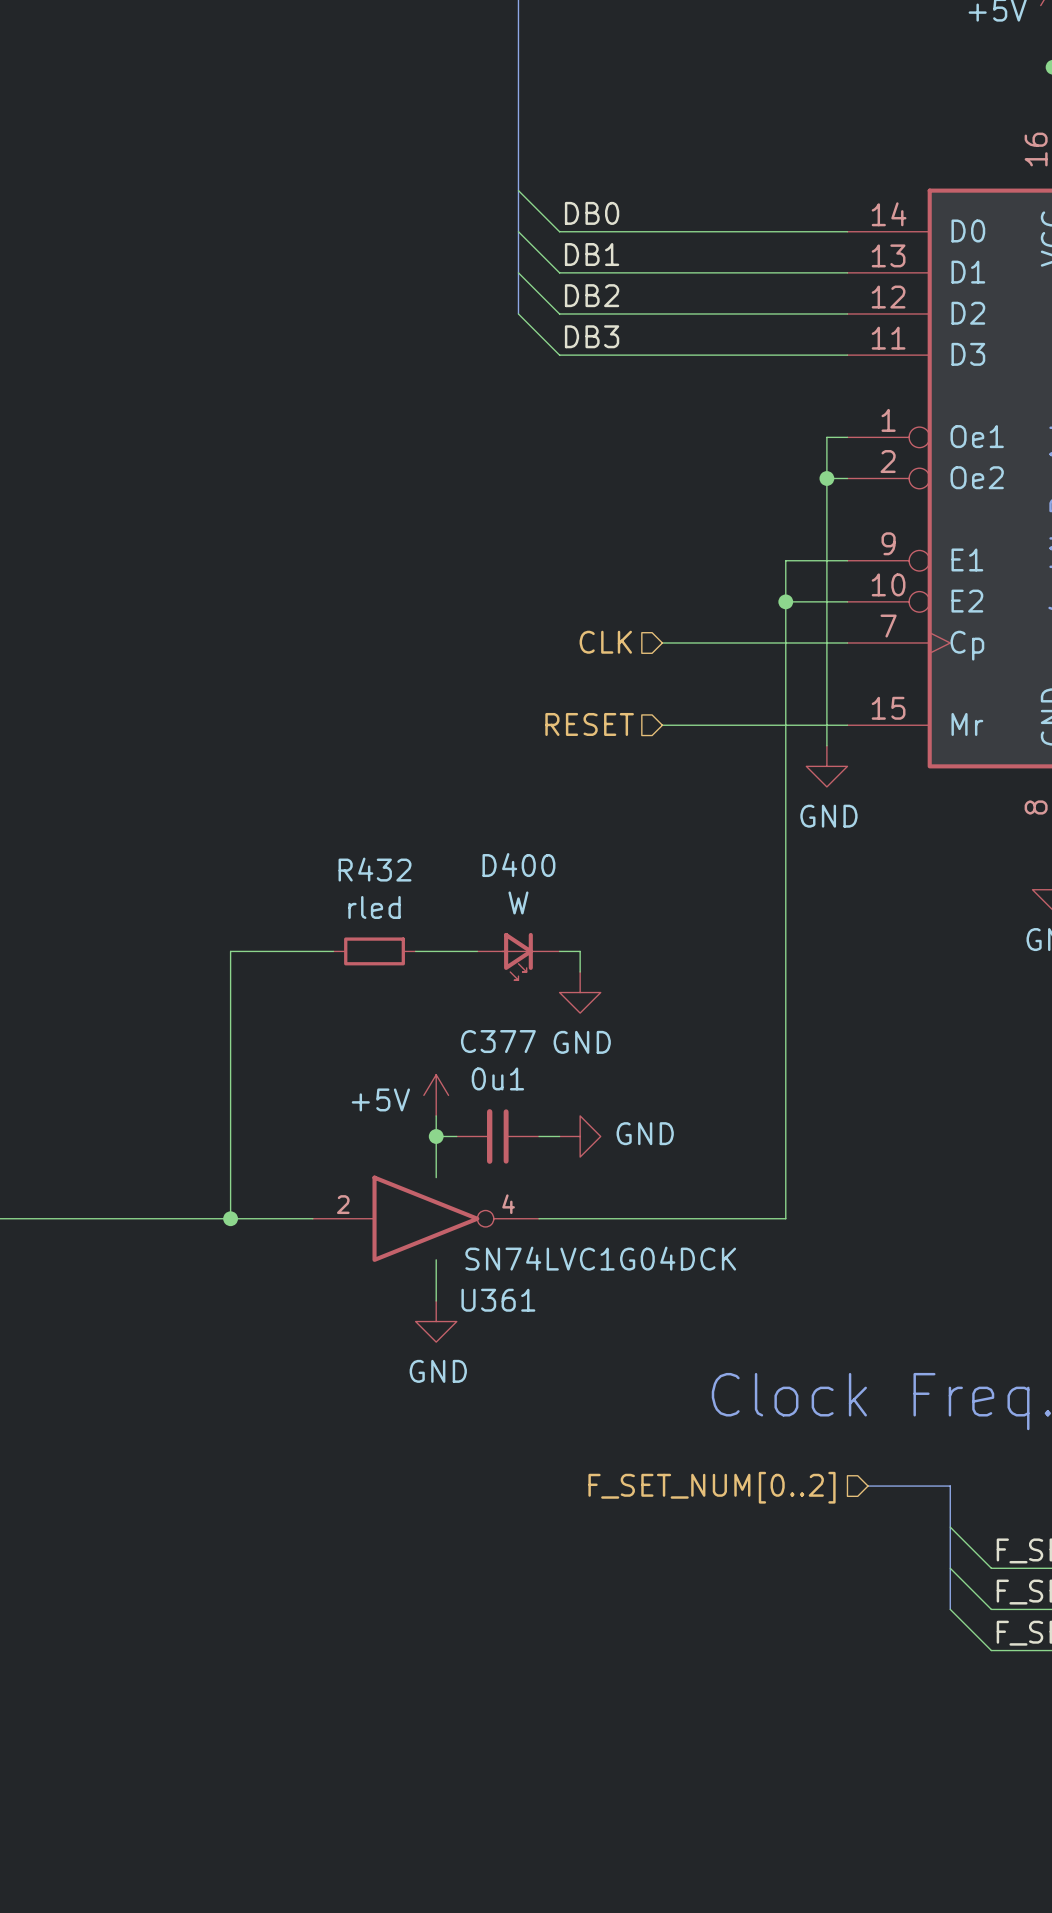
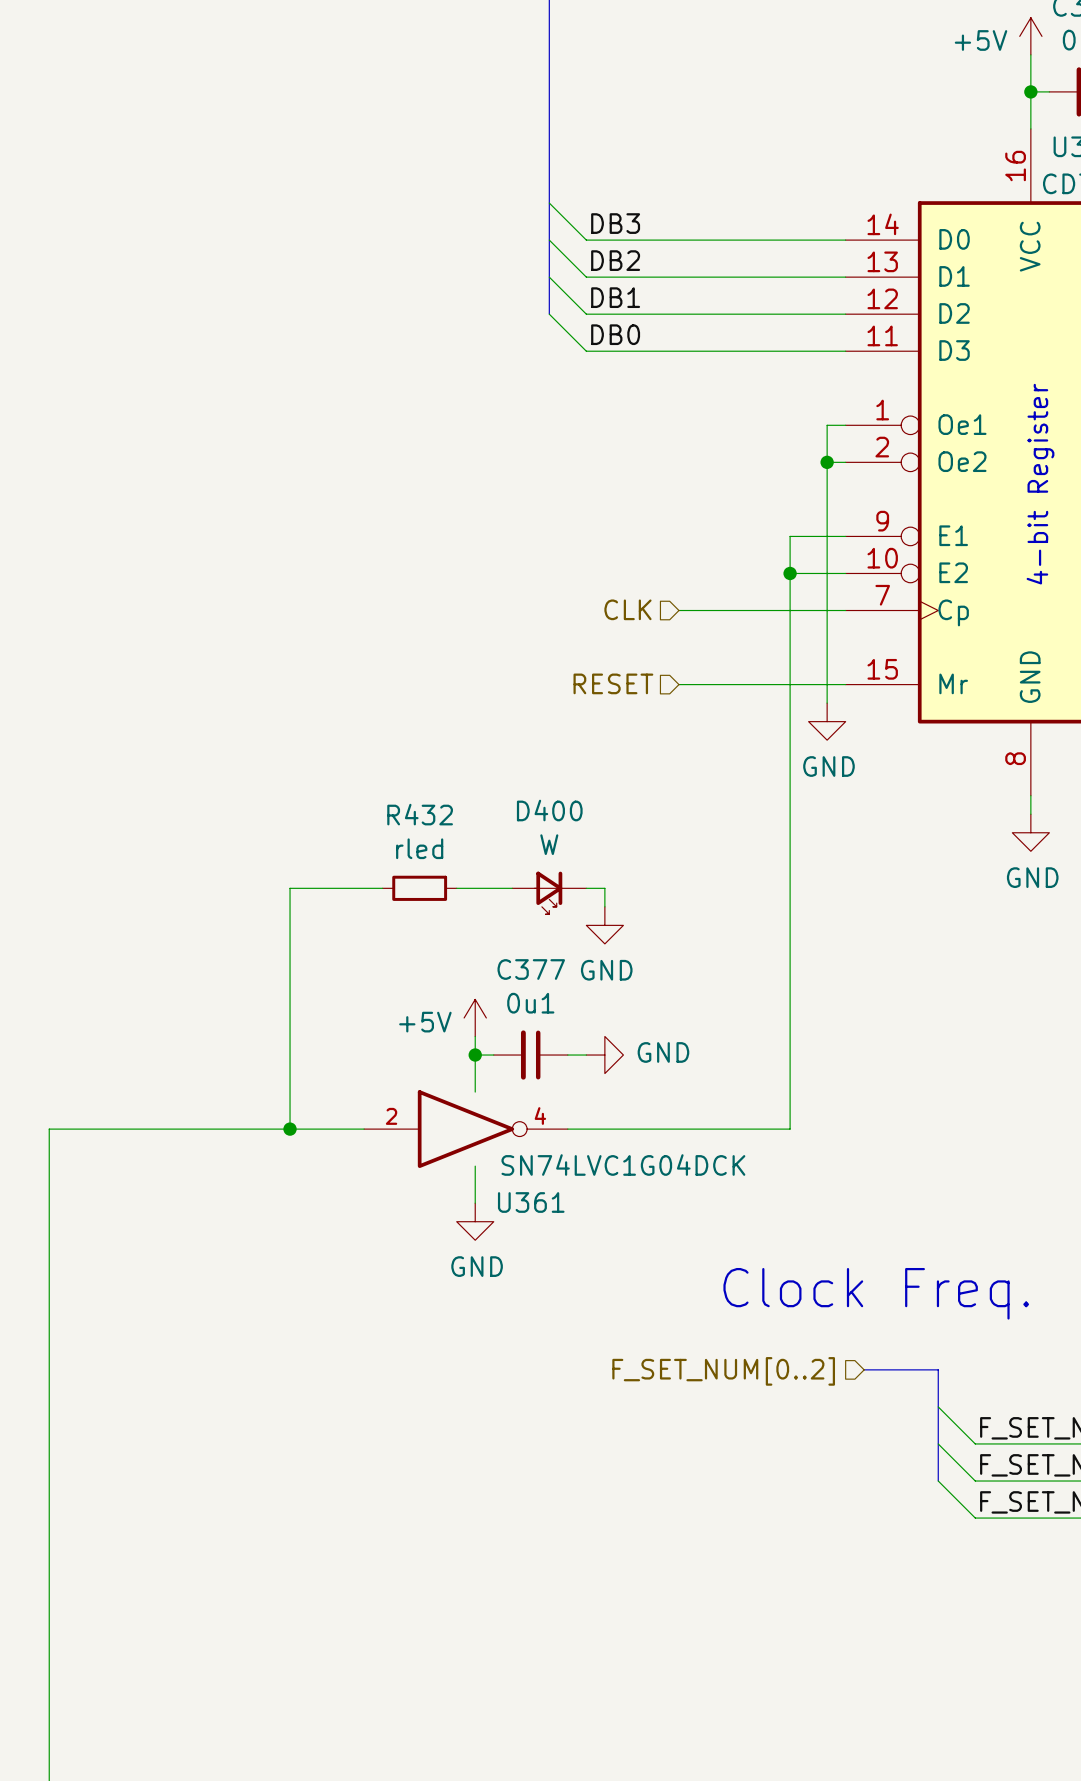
label: DB0 (592, 213) -> DB3 (615, 223)
label: DB1 (592, 254) -> DB2 (615, 260)
label: DB2 (592, 295) -> DB1 (615, 297)
label: DB3 (592, 336) -> DB0 (615, 334)

